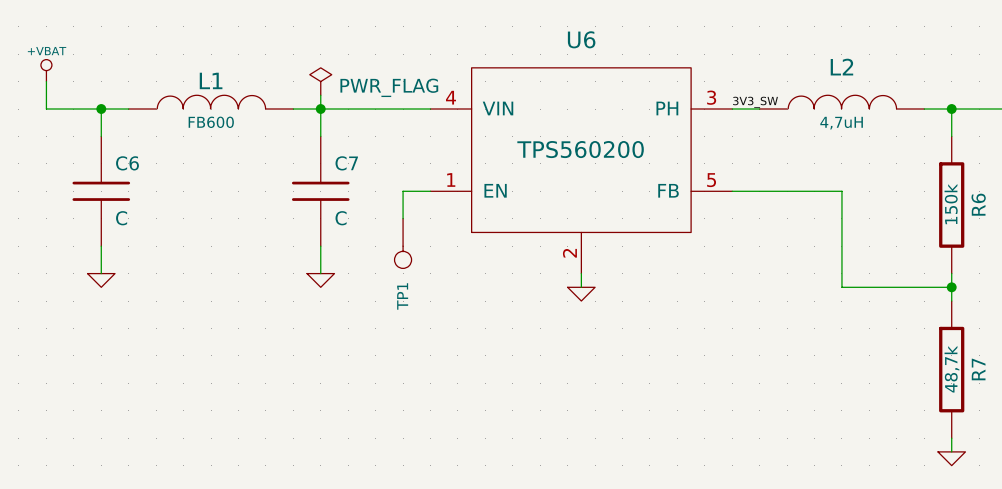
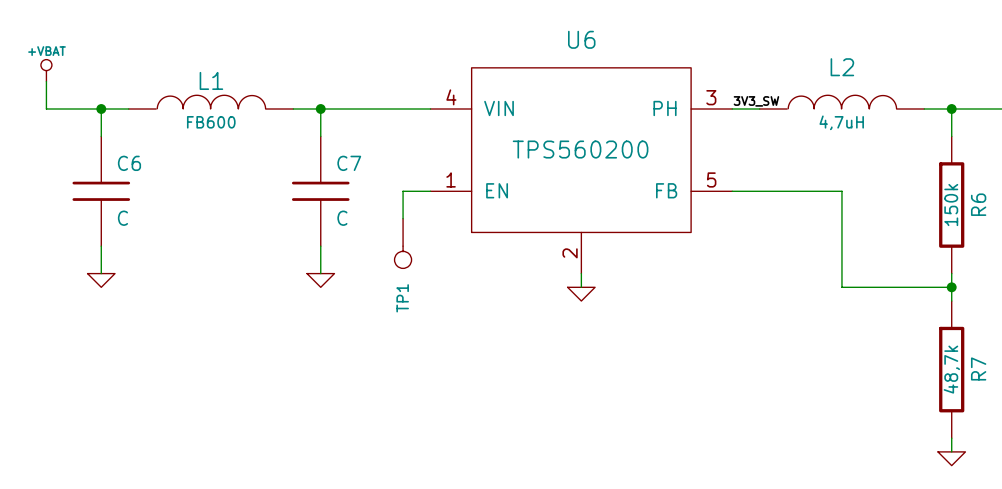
power symbol: PWR_FLAG (320, 81) -> none
wire: (320, 95) (320, 109) -> none

